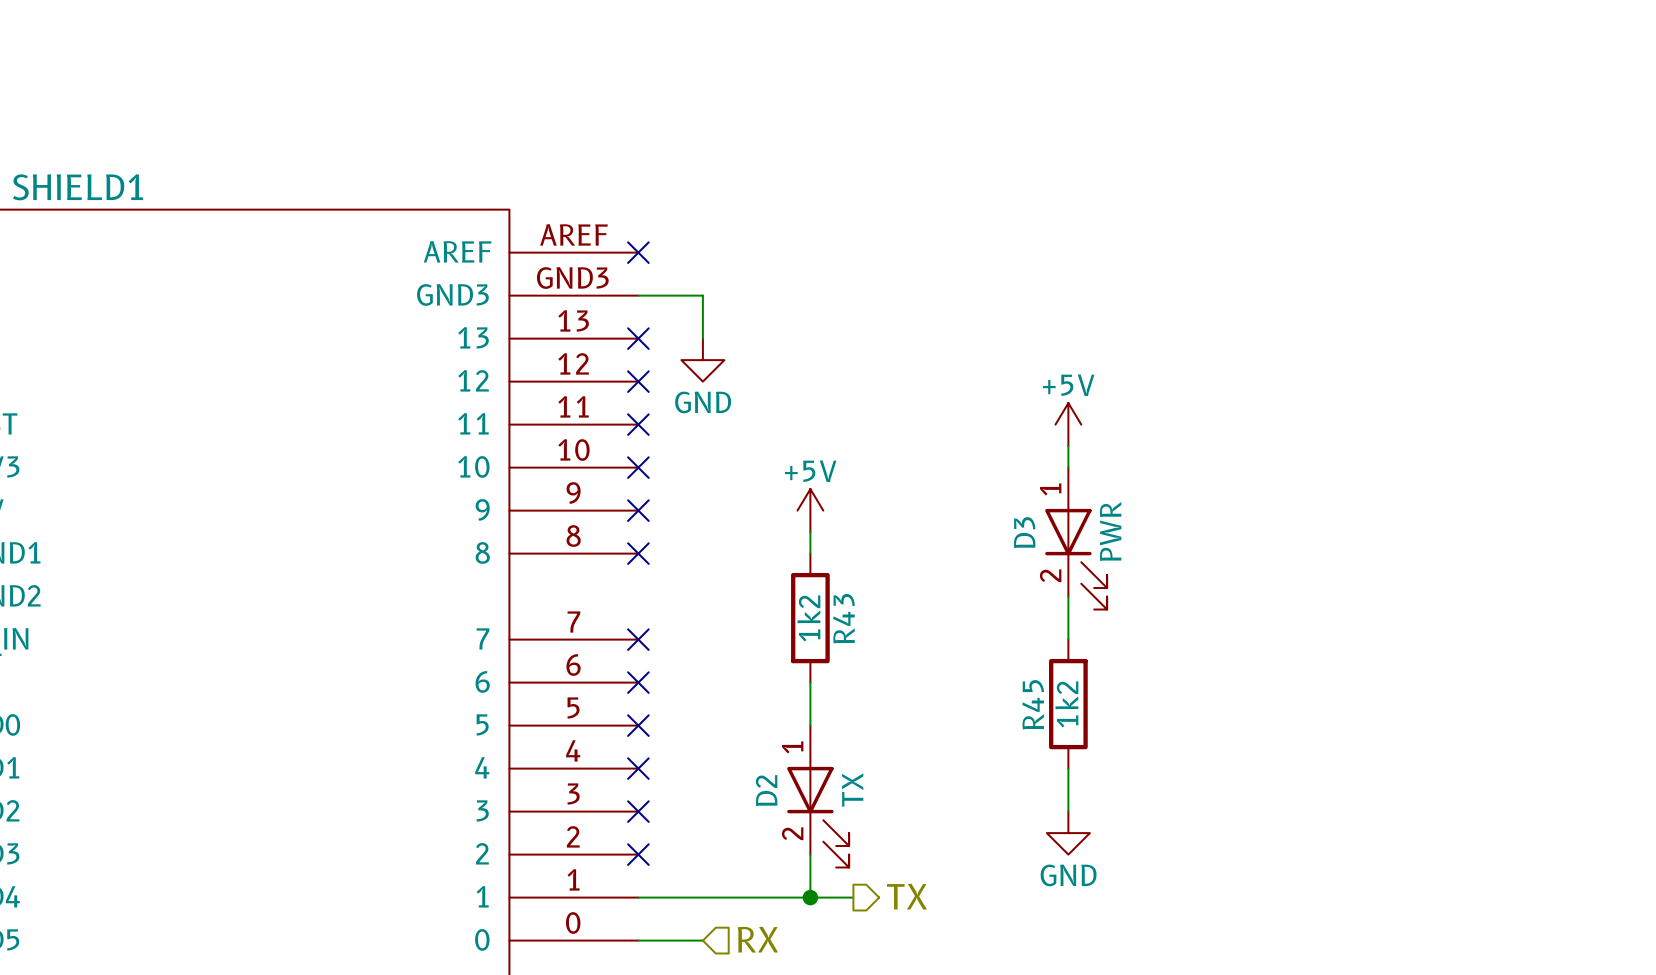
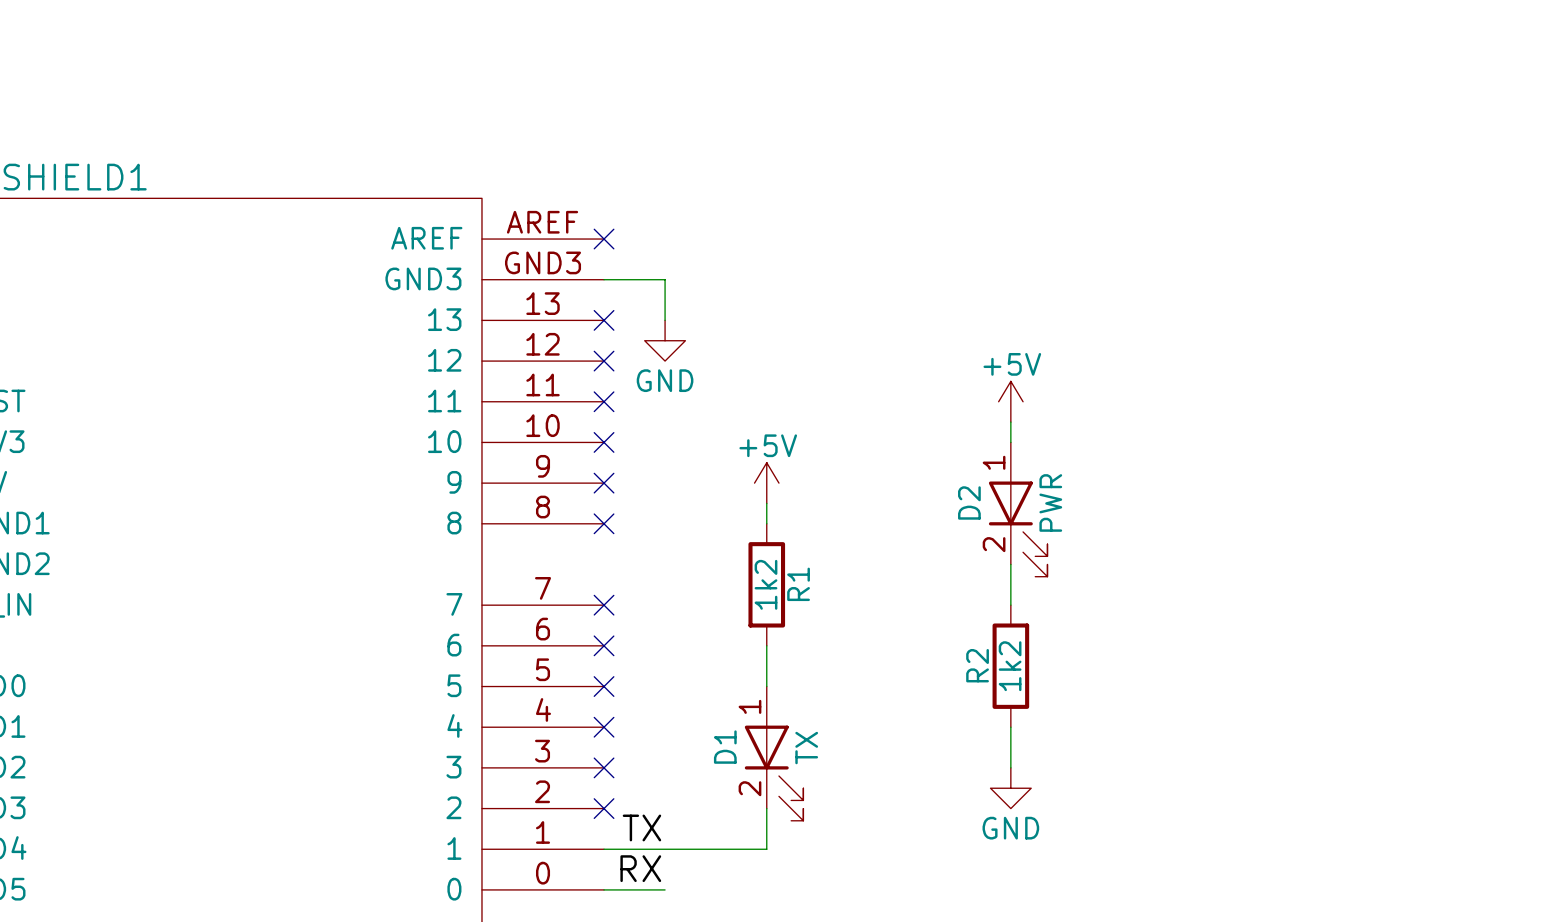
D3 name: D3 (1024, 532) -> D2 (969, 502)
R43 name: R43 (843, 618) -> R1 (798, 584)
R45 name: R45 (1033, 704) -> R2 (977, 665)
D2 name: D2 (766, 790) -> D1 (725, 747)
label: none -> TX (641, 827)
hierarchical label: TX (906, 896) -> none
wire: (810, 897) (853, 897) -> none
junction: (810, 897) -> none
label: none -> RX (640, 868)
hierarchical label: RX (757, 939) -> none

